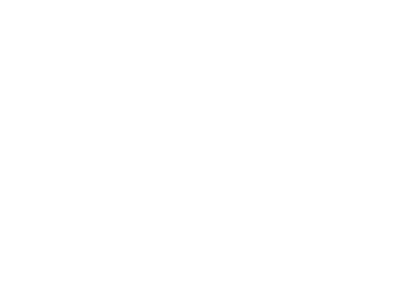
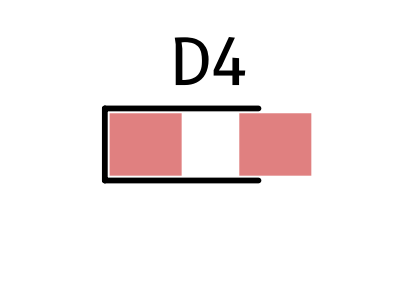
D4: none -> (206, 144)

